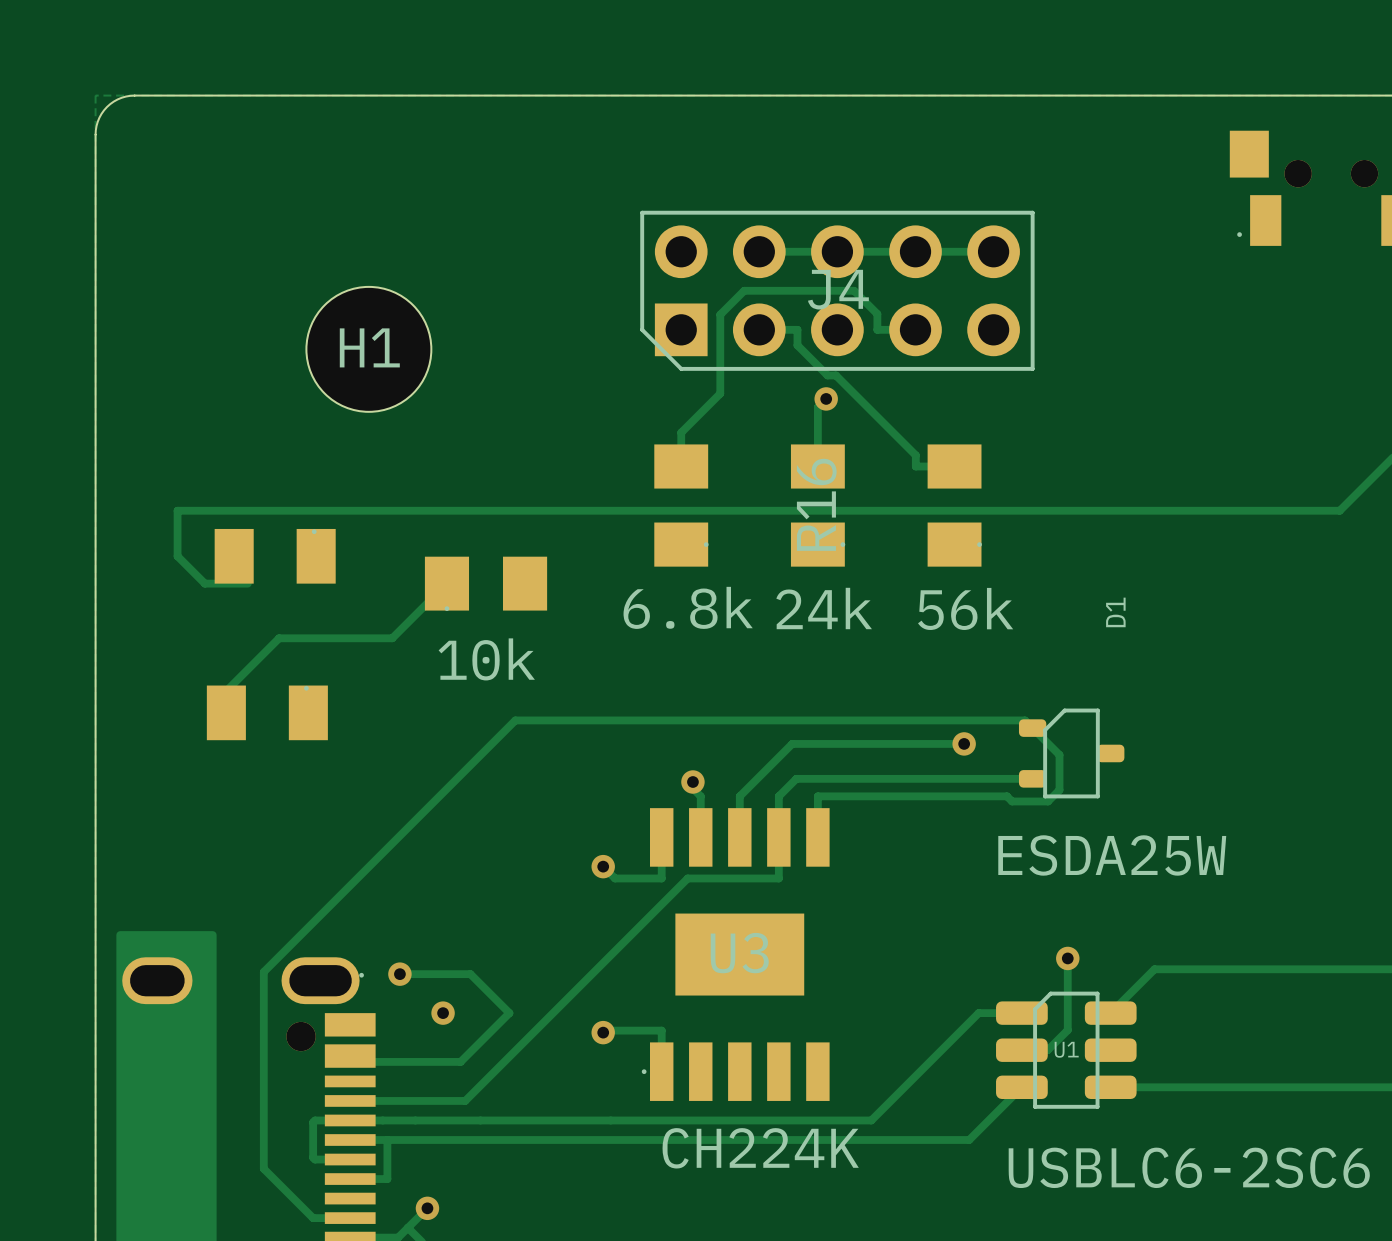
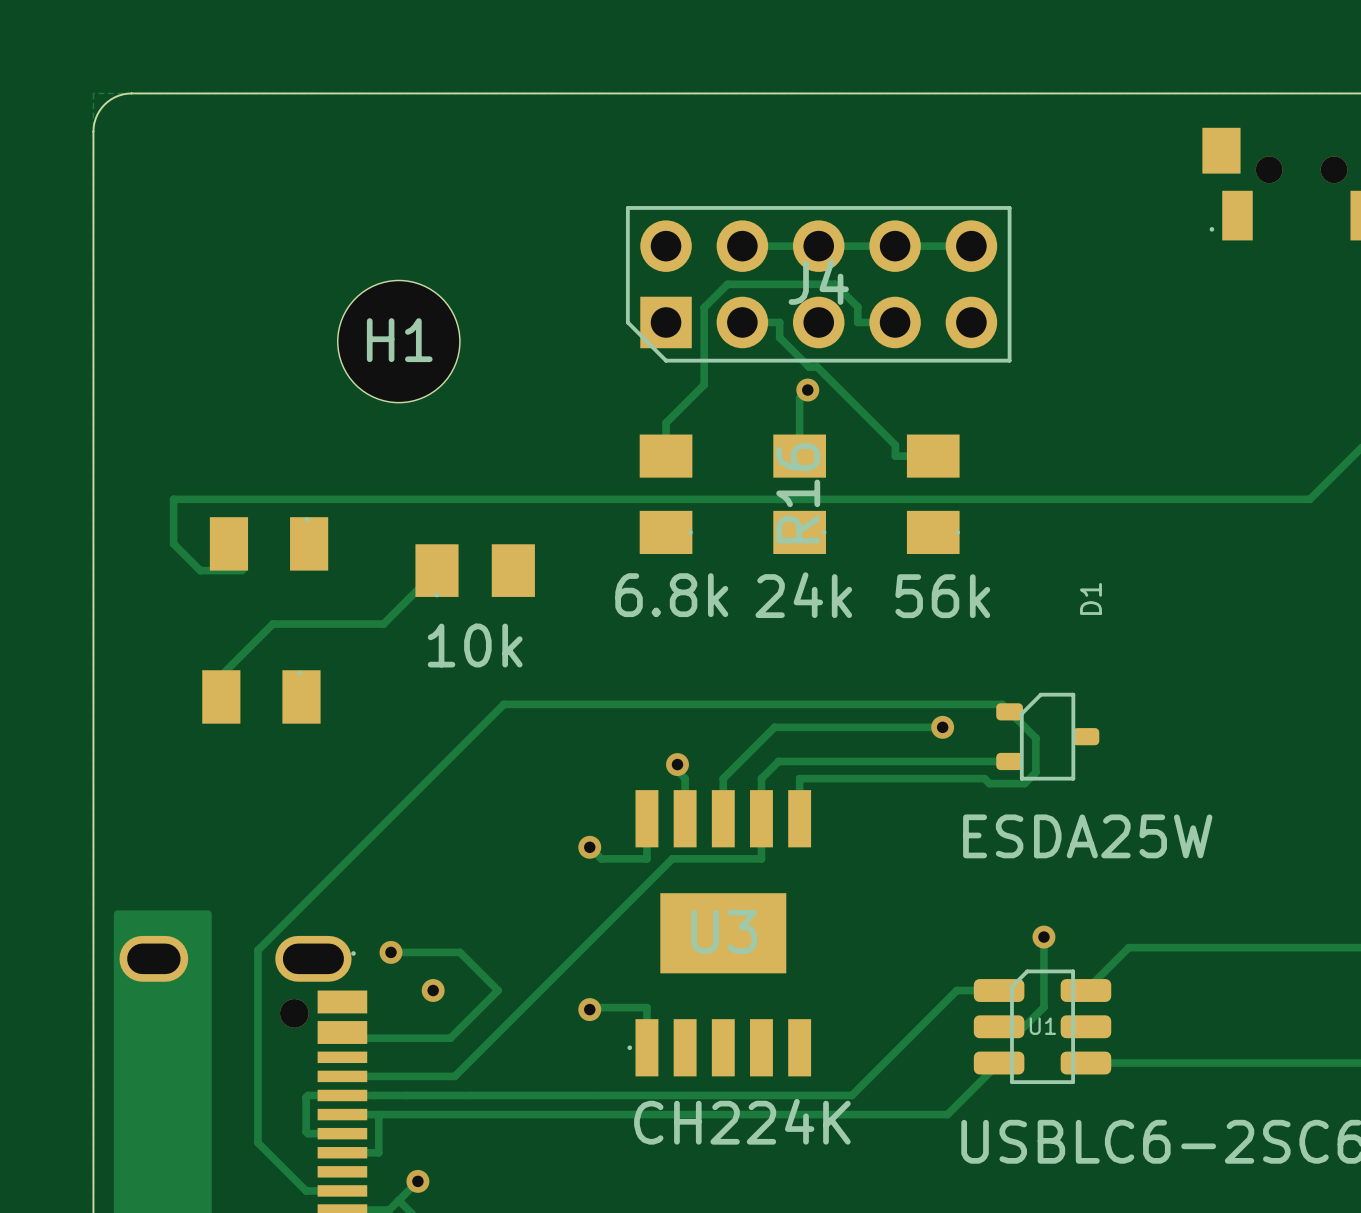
H1 position: (368, 349) -> (398, 341)

